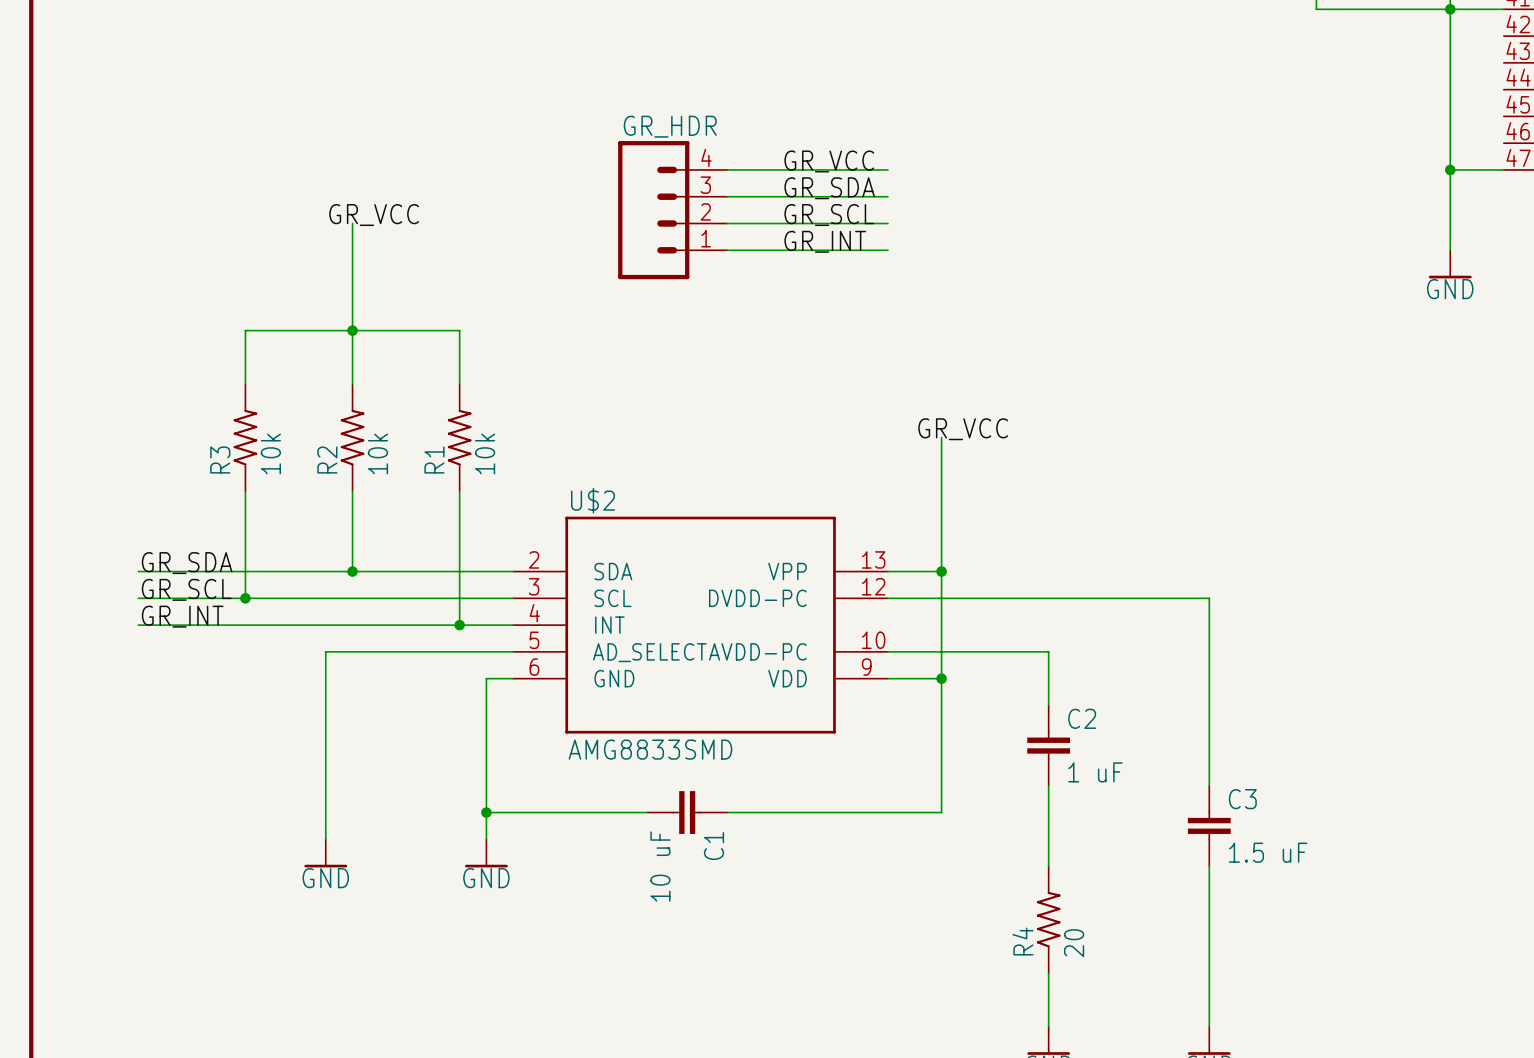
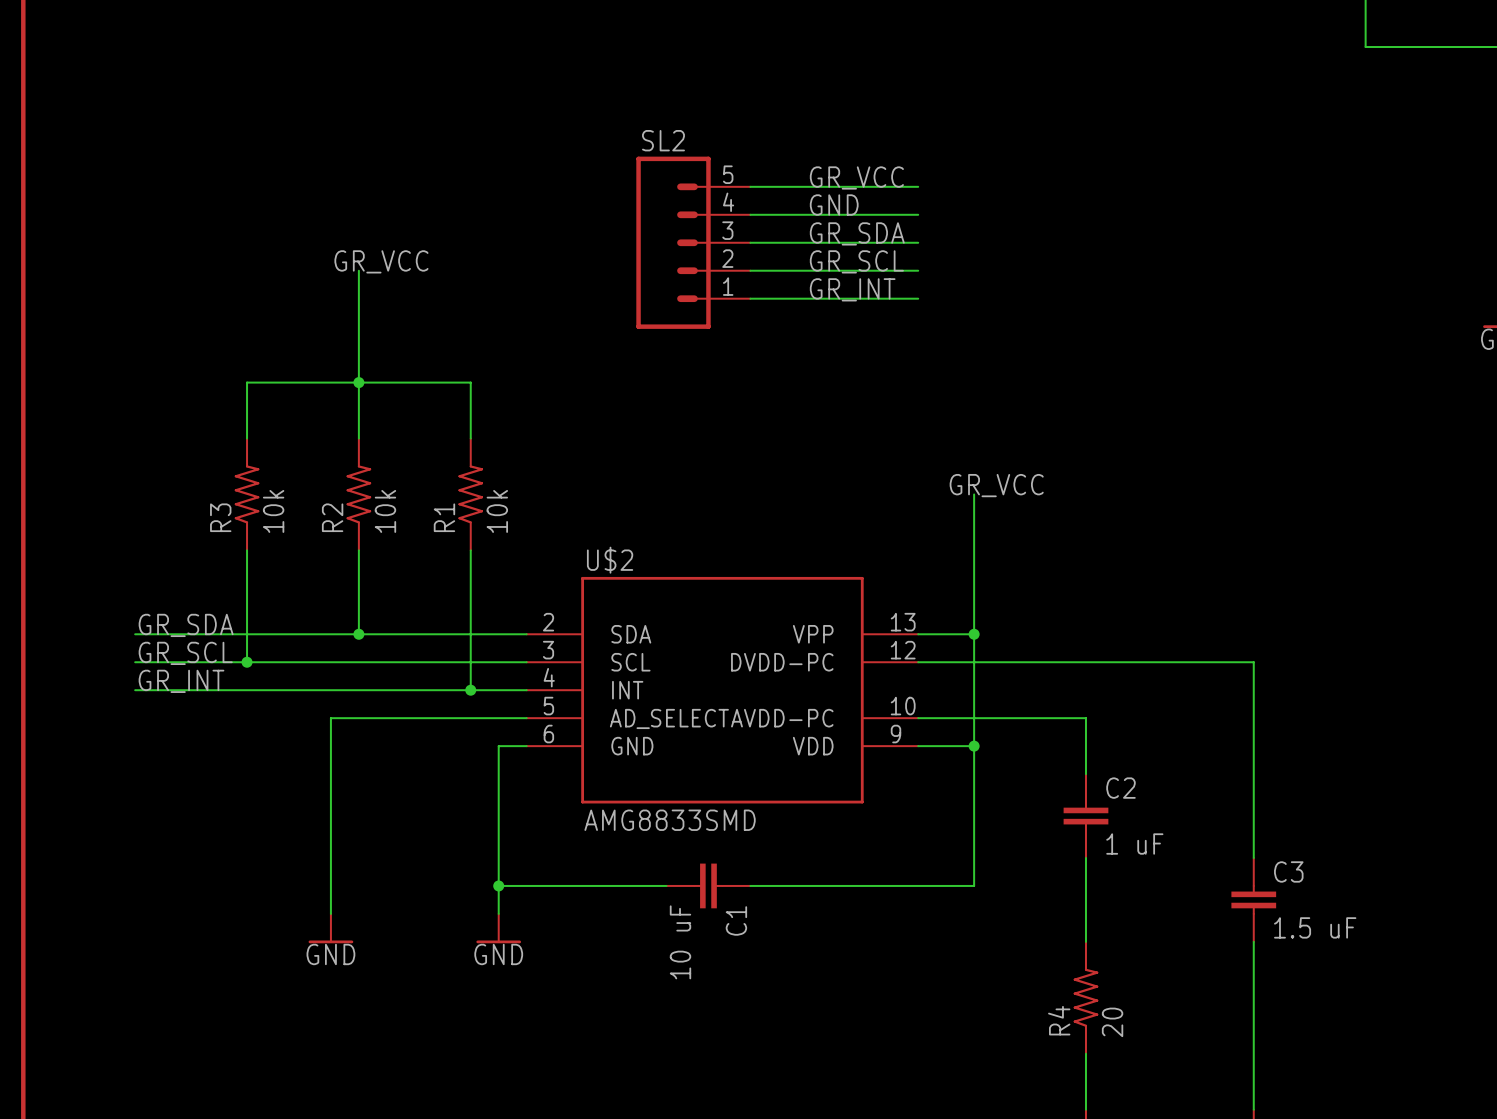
label: none -> GR_VCC (856, 177)
wire: none -> (750, 186) (918, 186)
label: GR_VCC (829, 161) -> GND (834, 205)
SL2: none -> (693, 242)
GR_HDR: (672, 210) -> none

